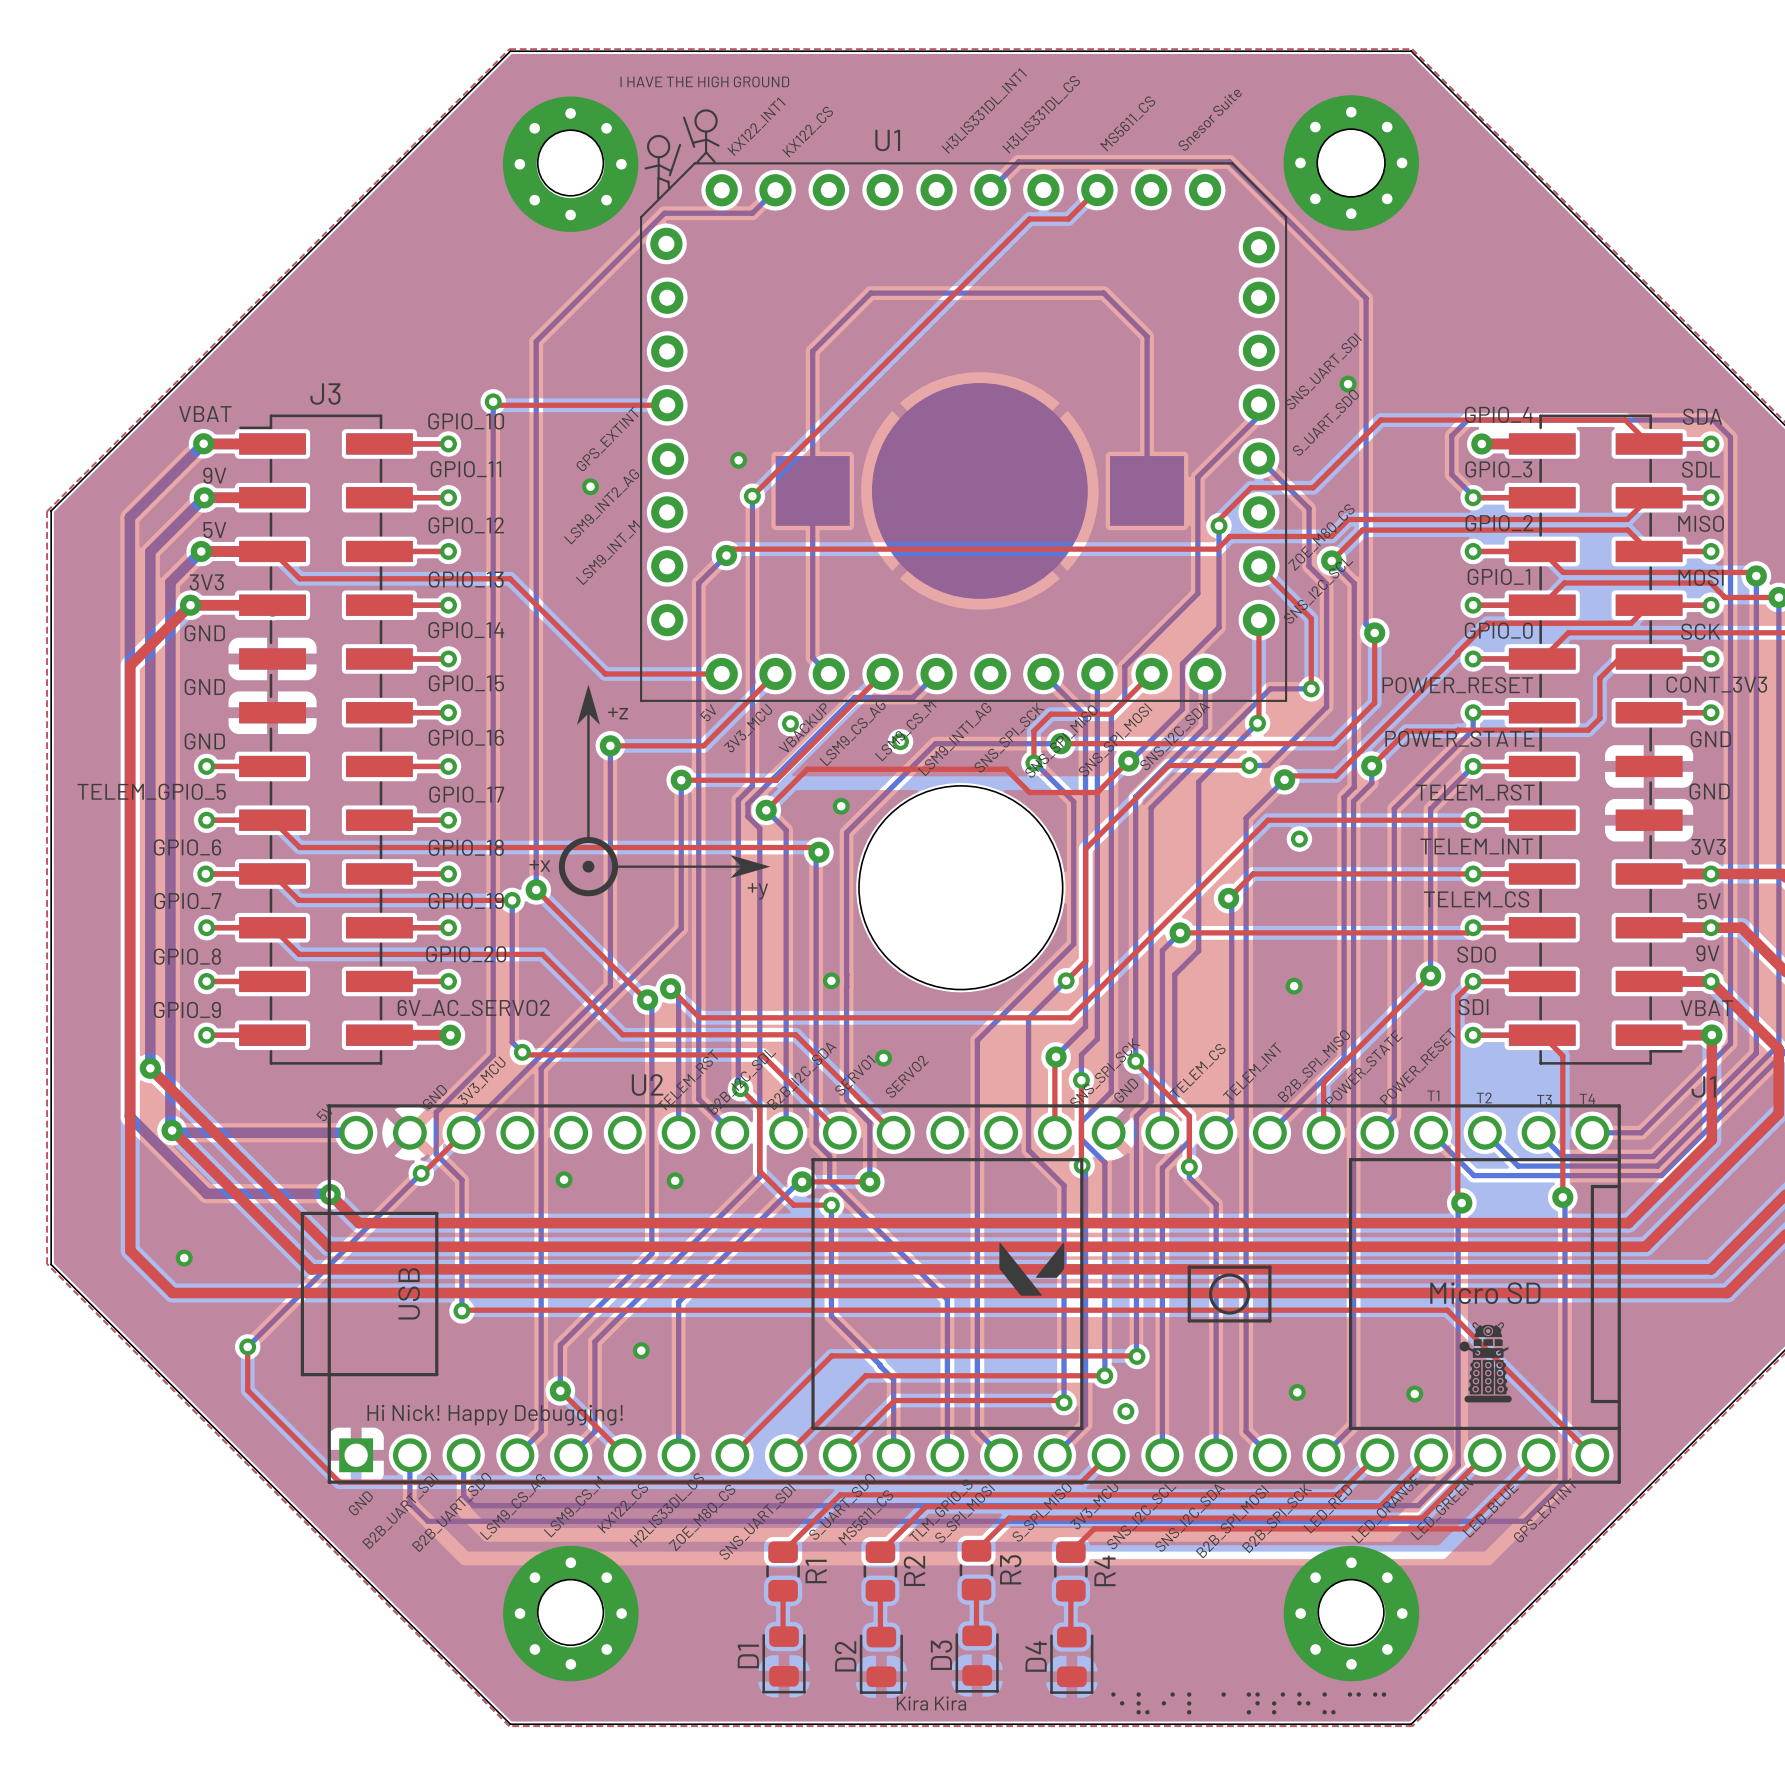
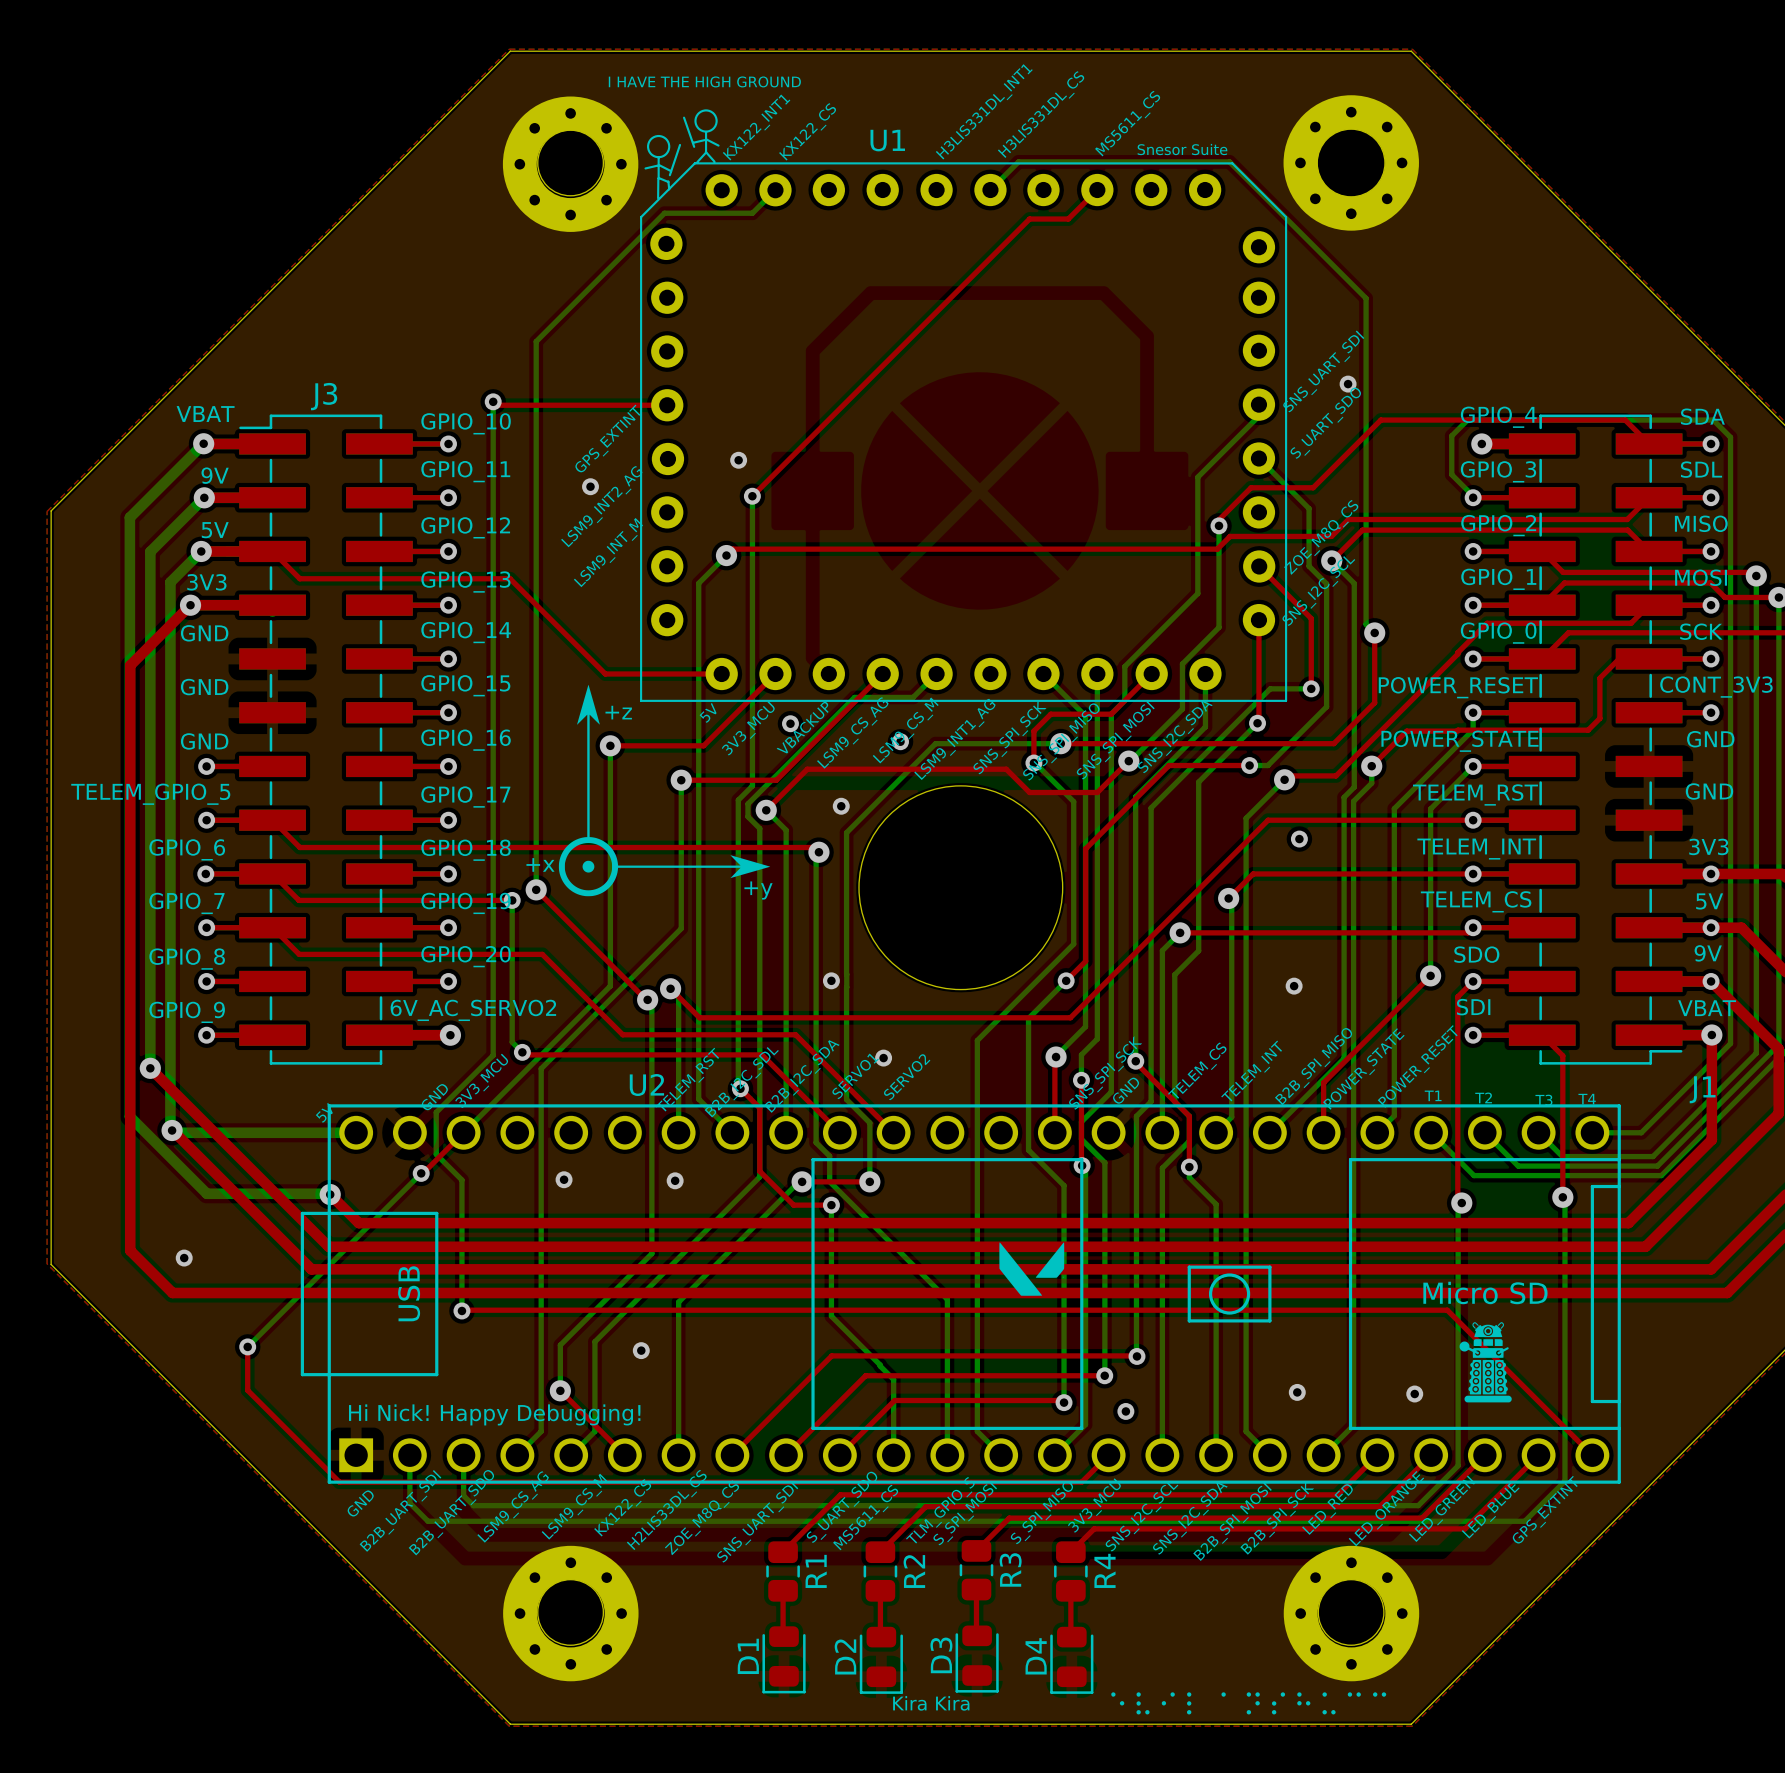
text rotation: 0° (1210, 120) -> 45° clockwise (1182, 149)
part: (979, 490) -> none
bottom track: (1147, 490) (1147, 336) (1103, 293) (870, 293) (812, 351) (812, 657) (828, 673) -> none

